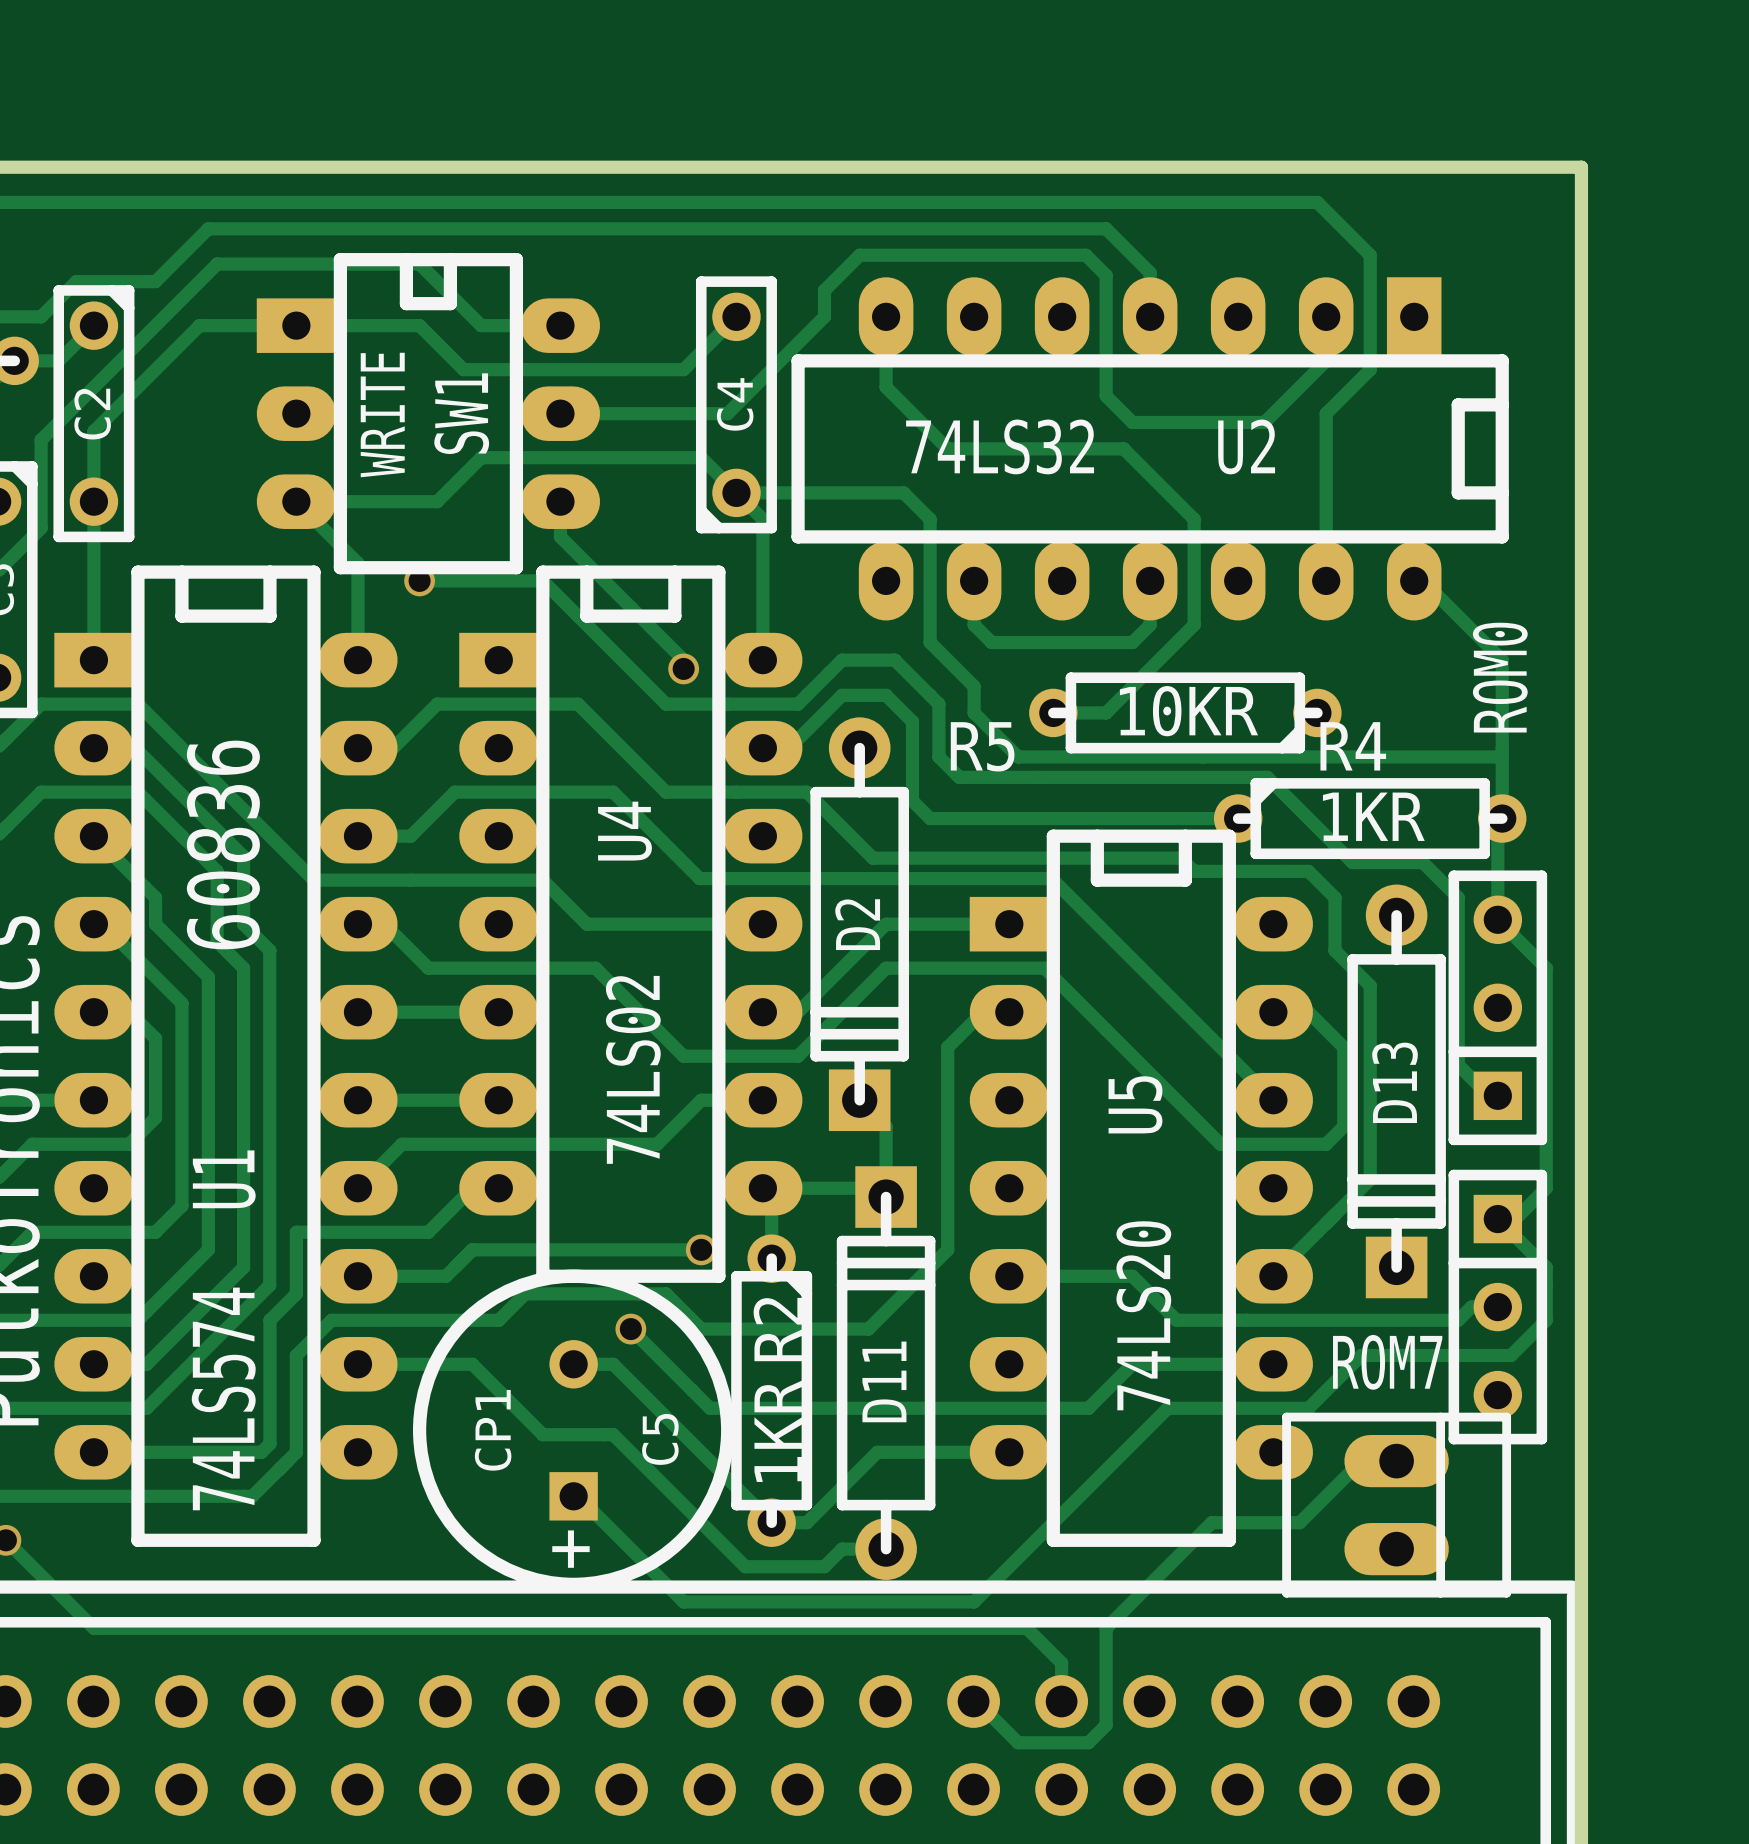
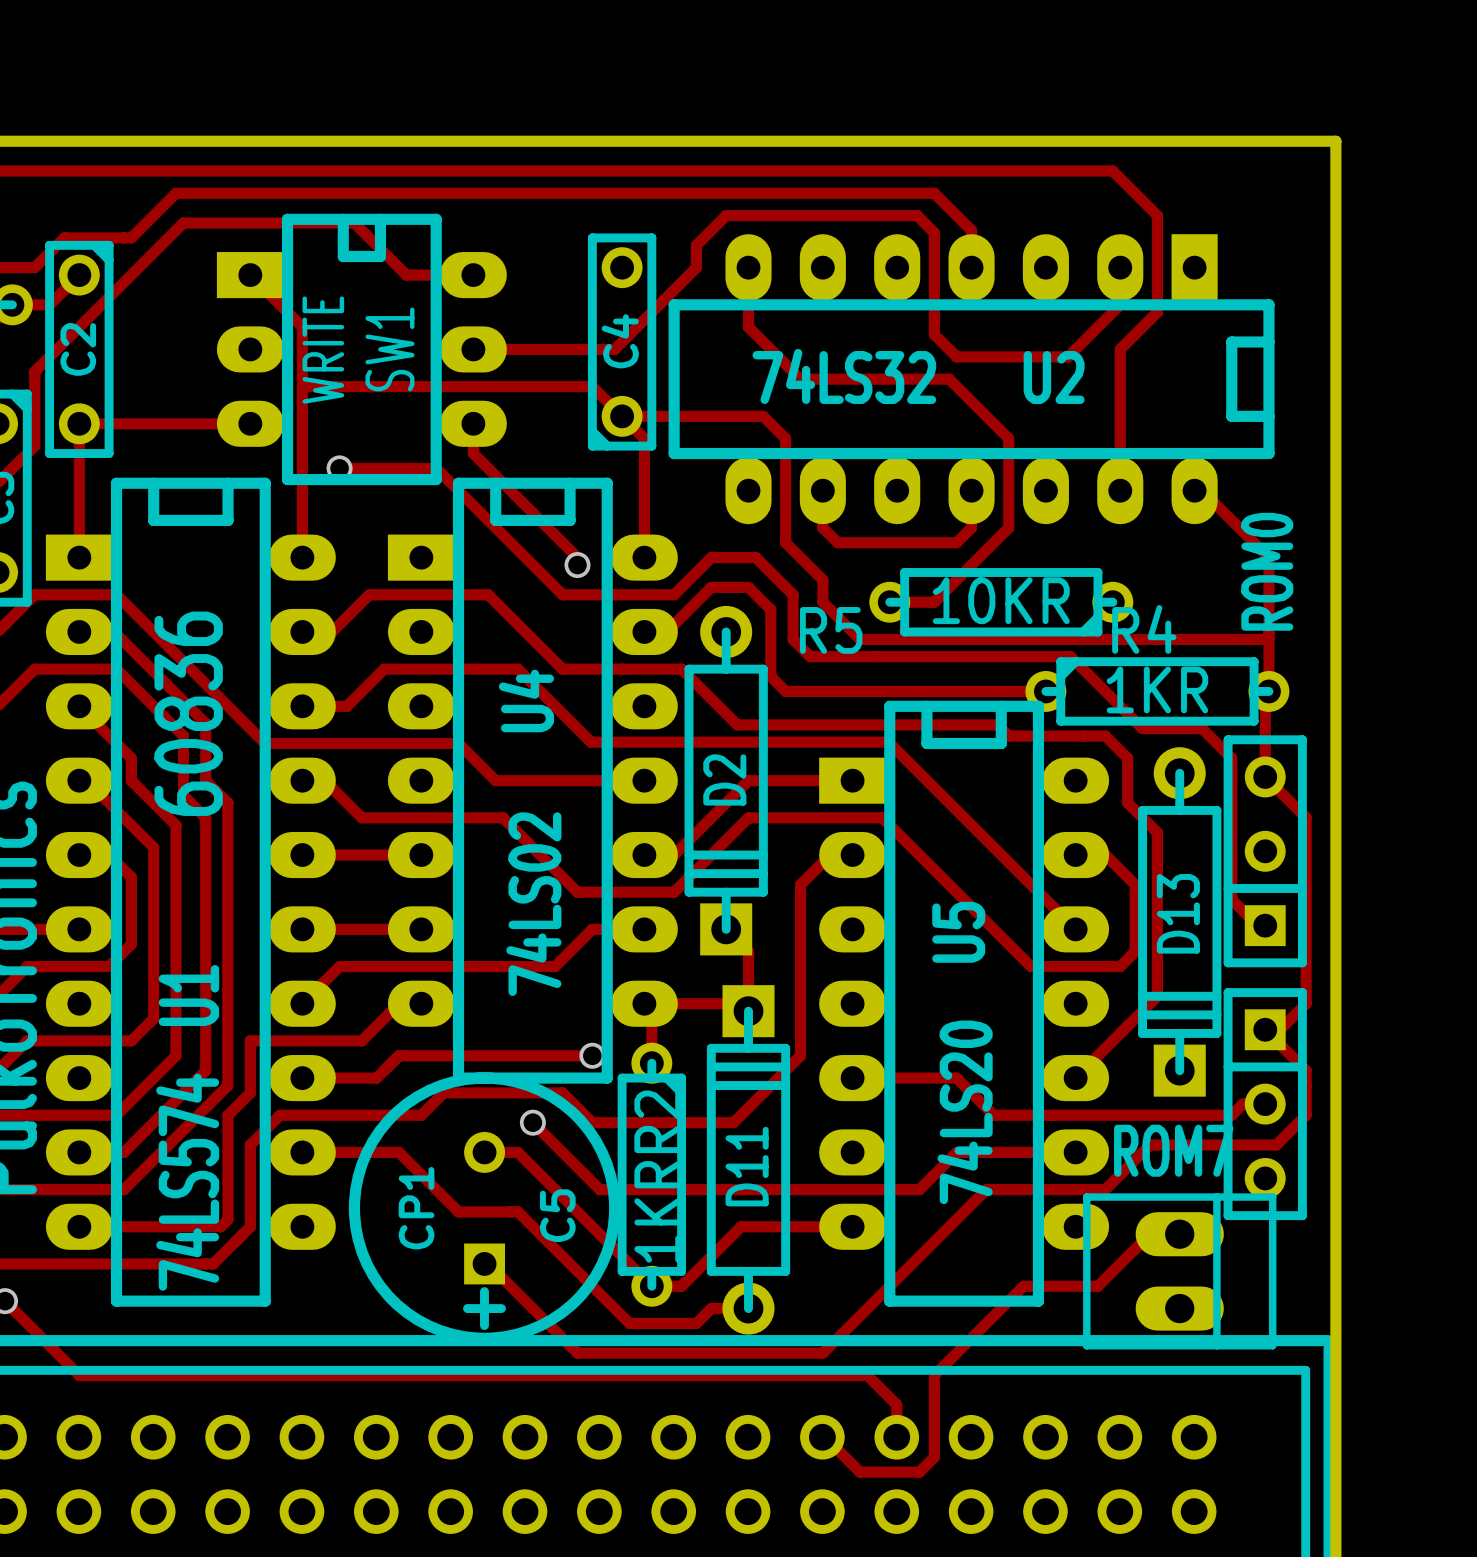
track: (718, 316) (736, 316) (683, 369) (463, 369) (419, 325) (199, 325) (93, 431) (93, 501) -> (250, 423) (79, 423)
track: none -> (250, 275) (302, 327) (302, 475)
track: (481, 457) (437, 501) (296, 501) (357, 563) -> (406, 386) (302, 386)
track: (419, 580) (542, 580) -> (339, 468) (436, 468) (458, 490)
via position: (419, 580) -> (339, 468)

